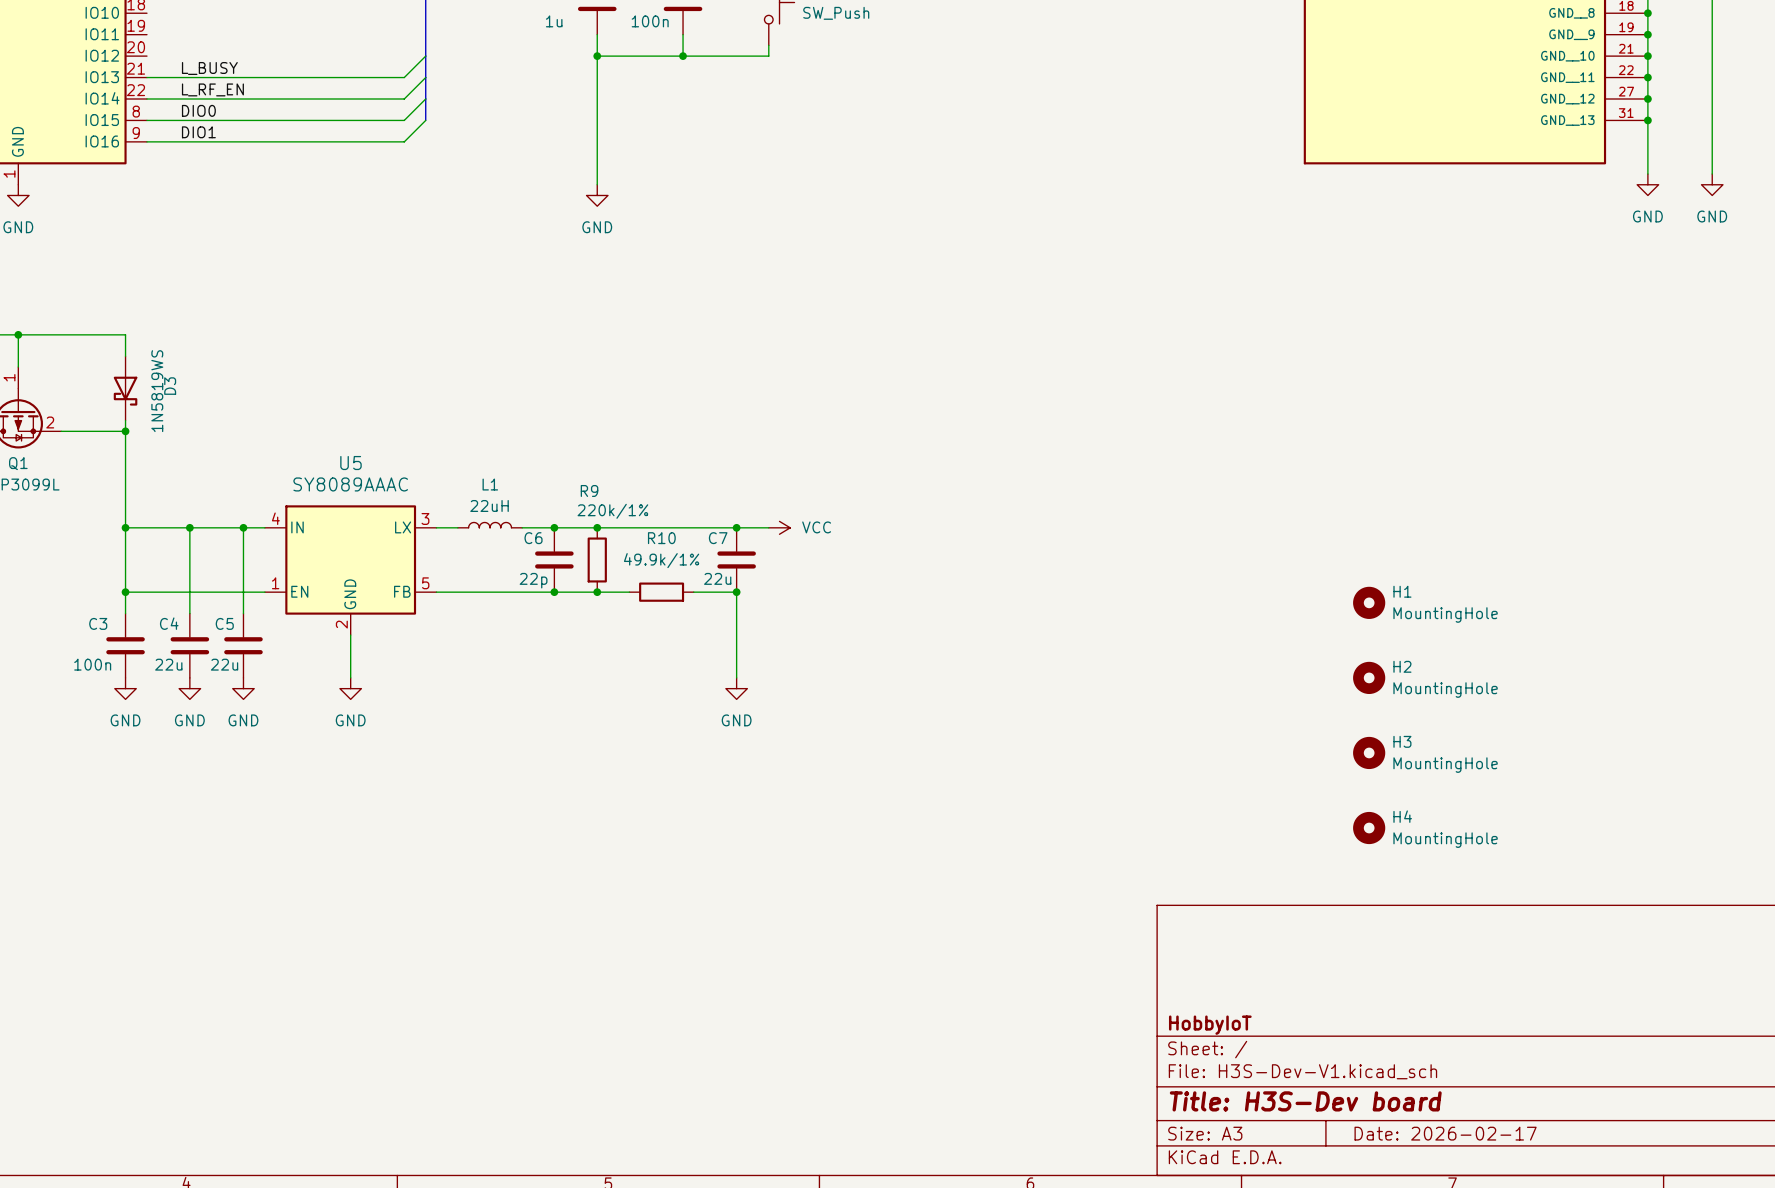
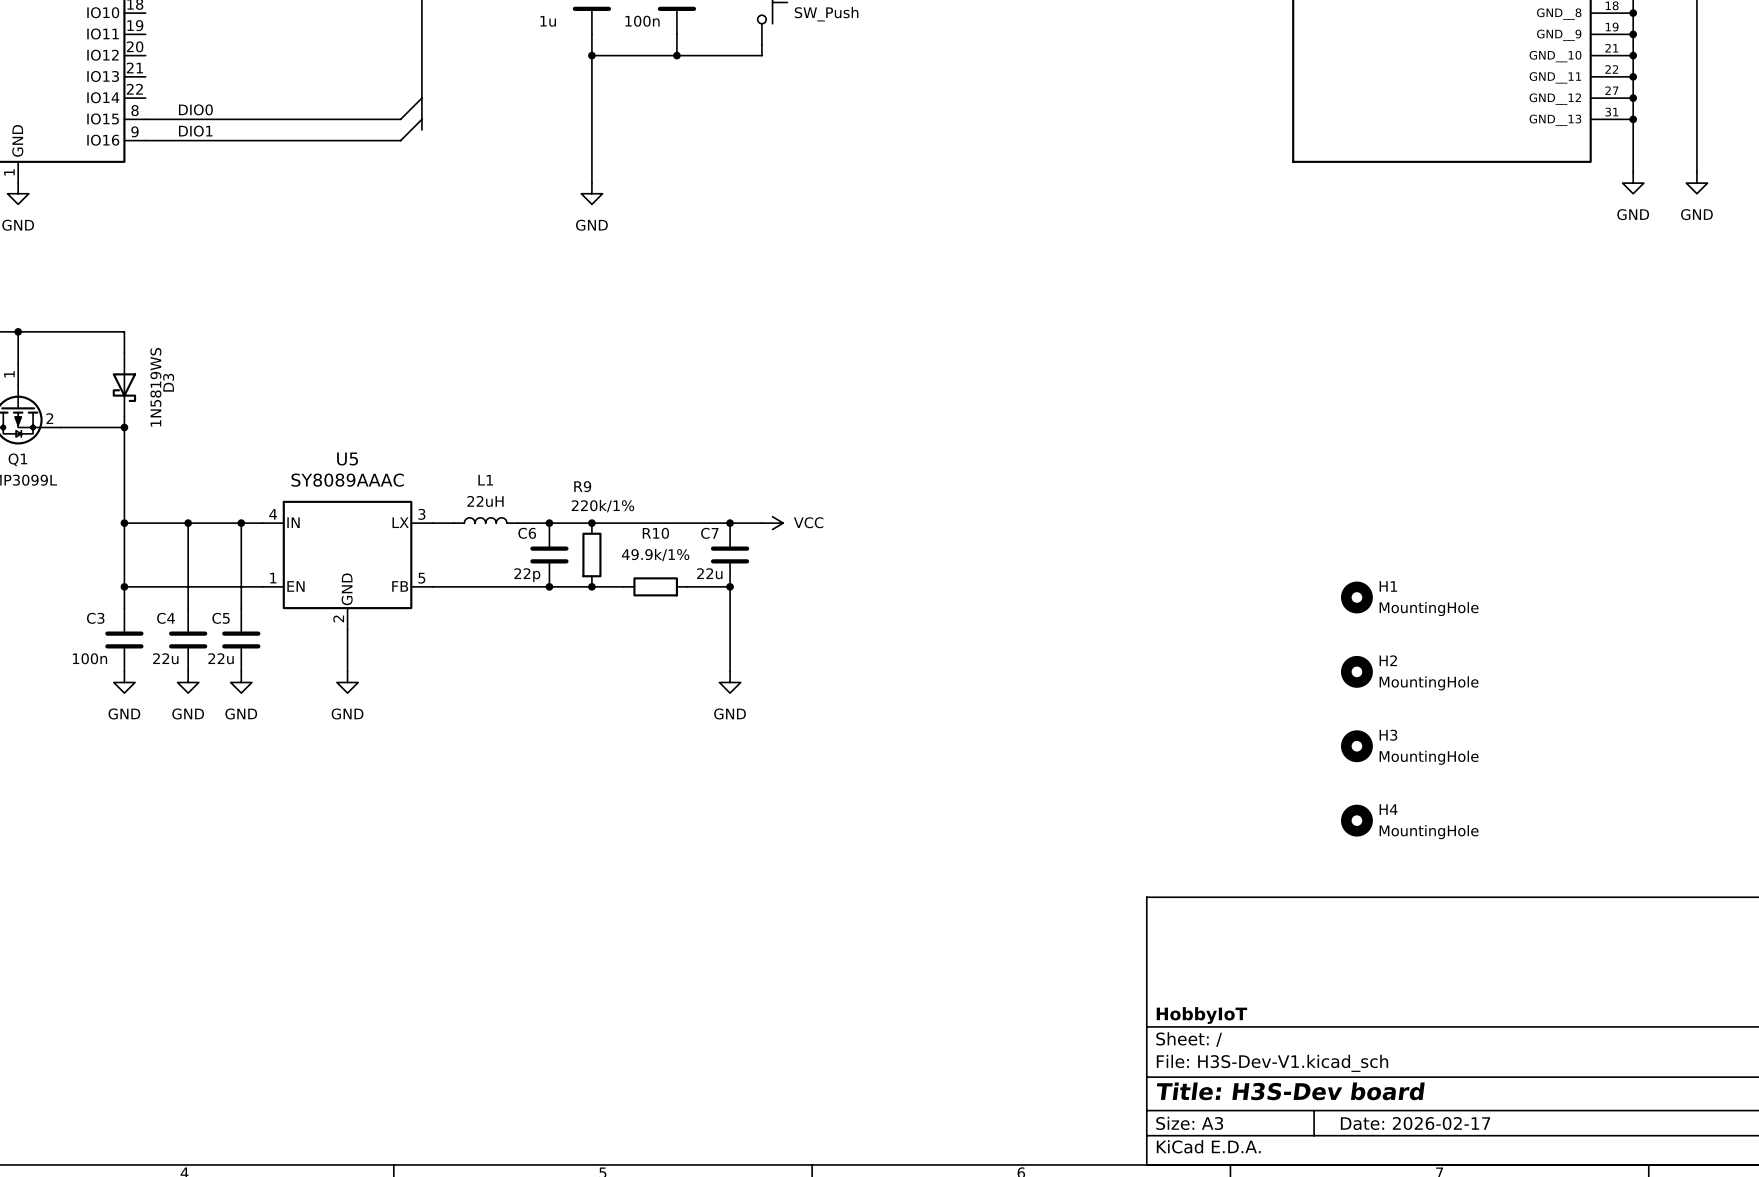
wire: (425, 56) (404, 77) (146, 77) -> none
label: L_BUSY (209, 68) -> none
wire: (425, 77) (404, 98) (146, 98) -> none
label: L_RF_EN (212, 89) -> none
bus: none -> (421, 119) (421, 129)

